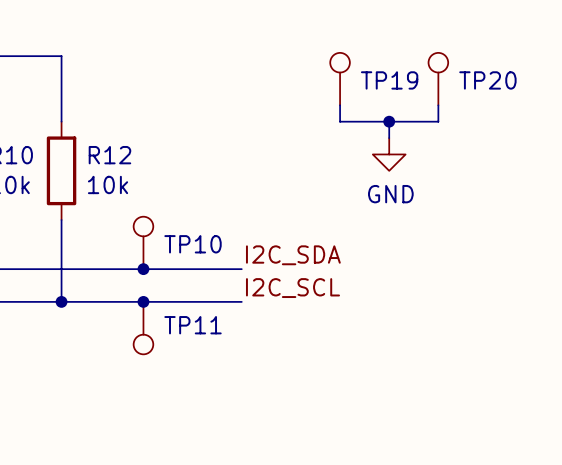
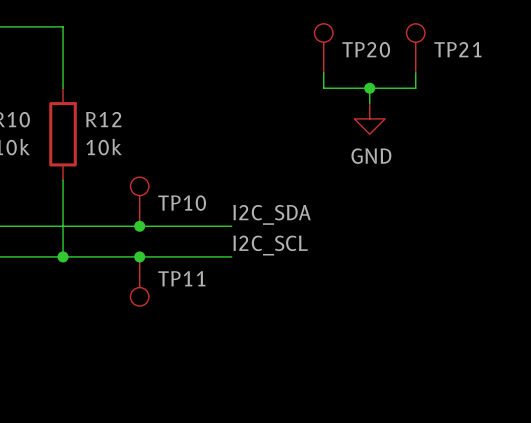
TP19 name: TP19 (389, 80) -> TP20 (366, 49)
TP20 name: TP20 (487, 80) -> TP21 (457, 49)

